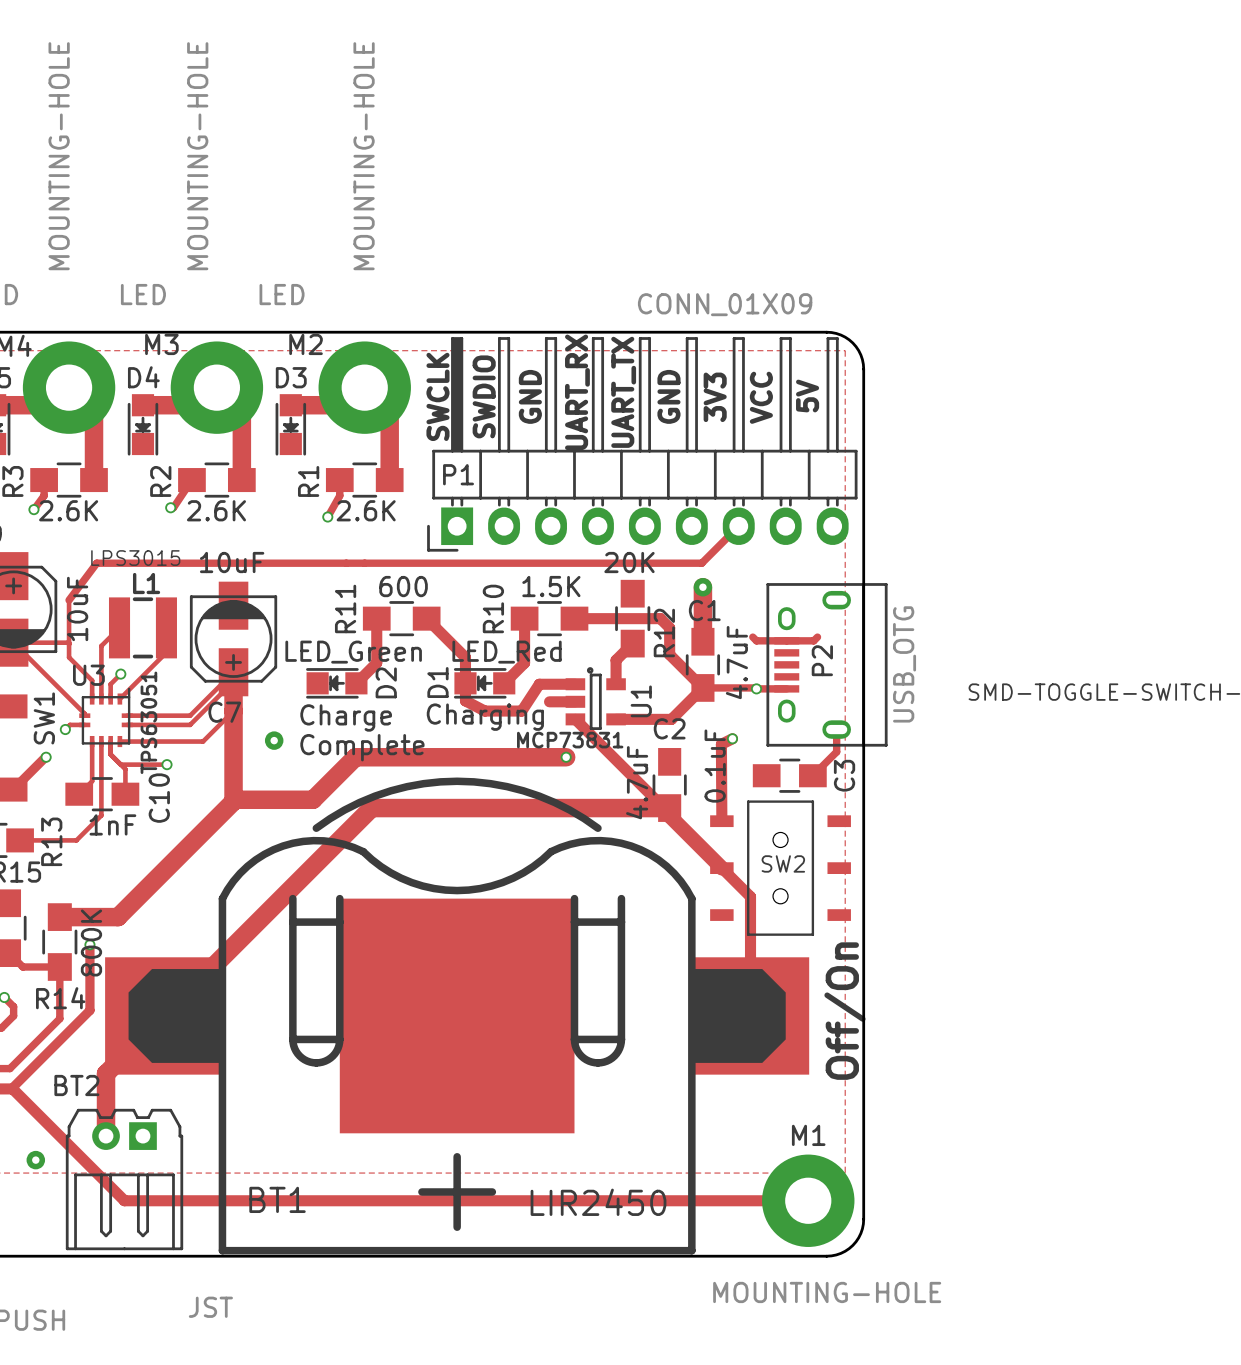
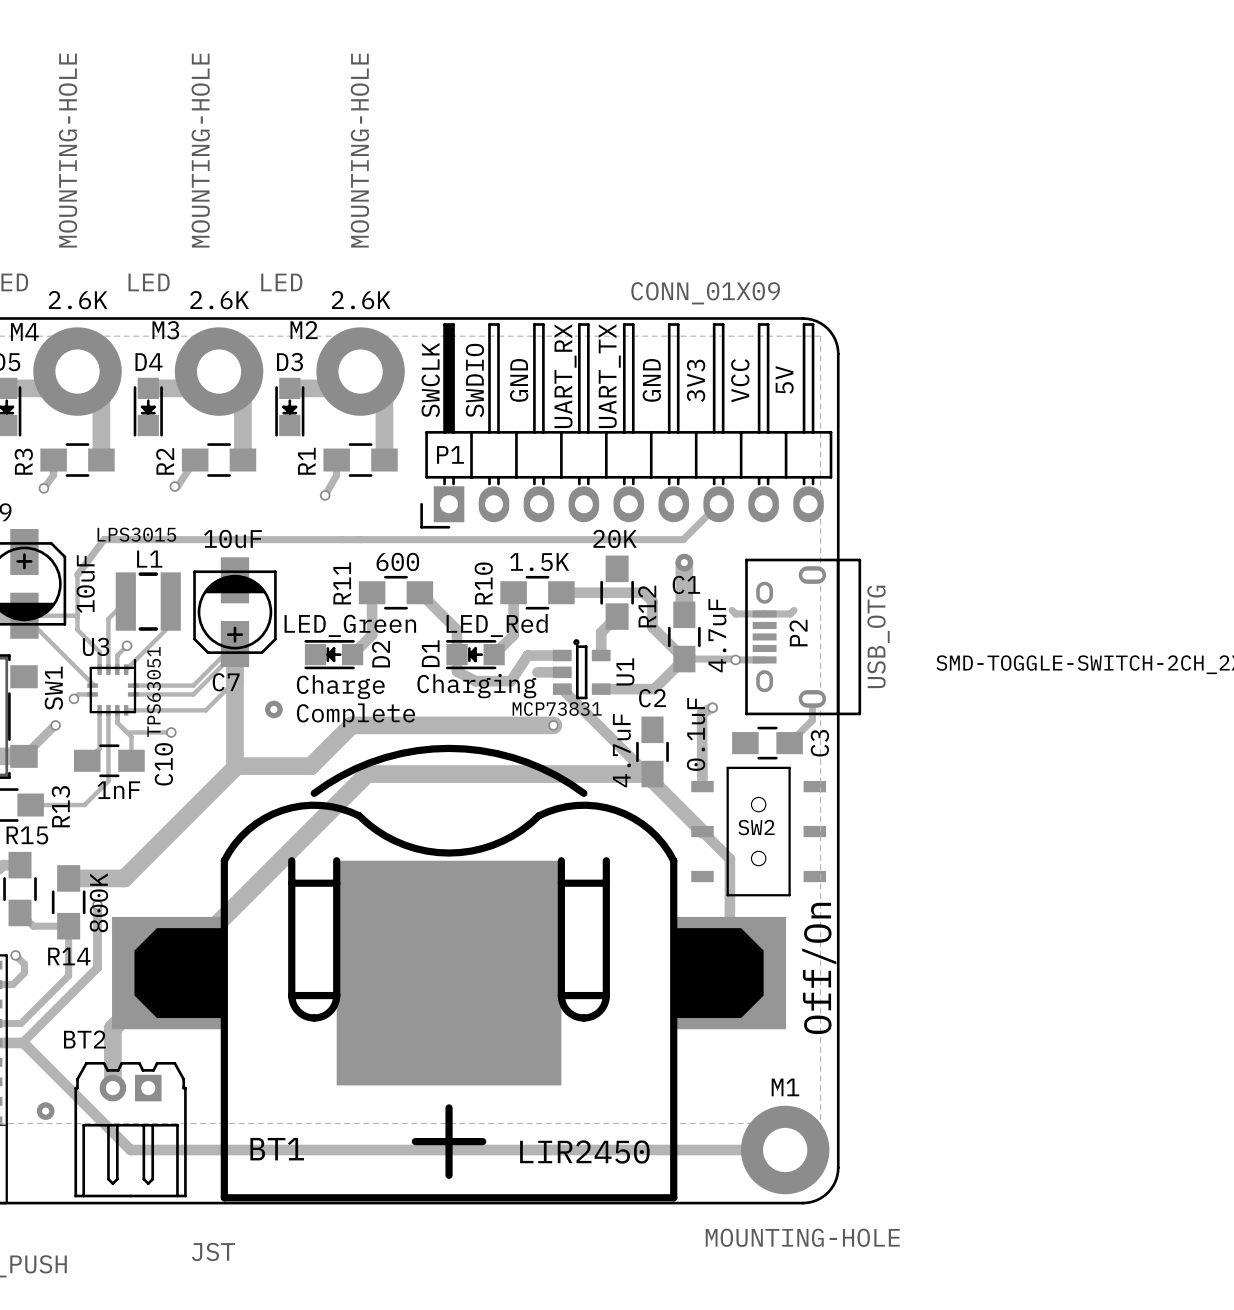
R3 value position: 2.6K (68, 510) -> 2.6K (78, 300)
R2 value position: 2.6K (216, 510) -> 2.6K (219, 300)
R1 value position: 2.6K (366, 510) -> 2.6K (361, 300)

